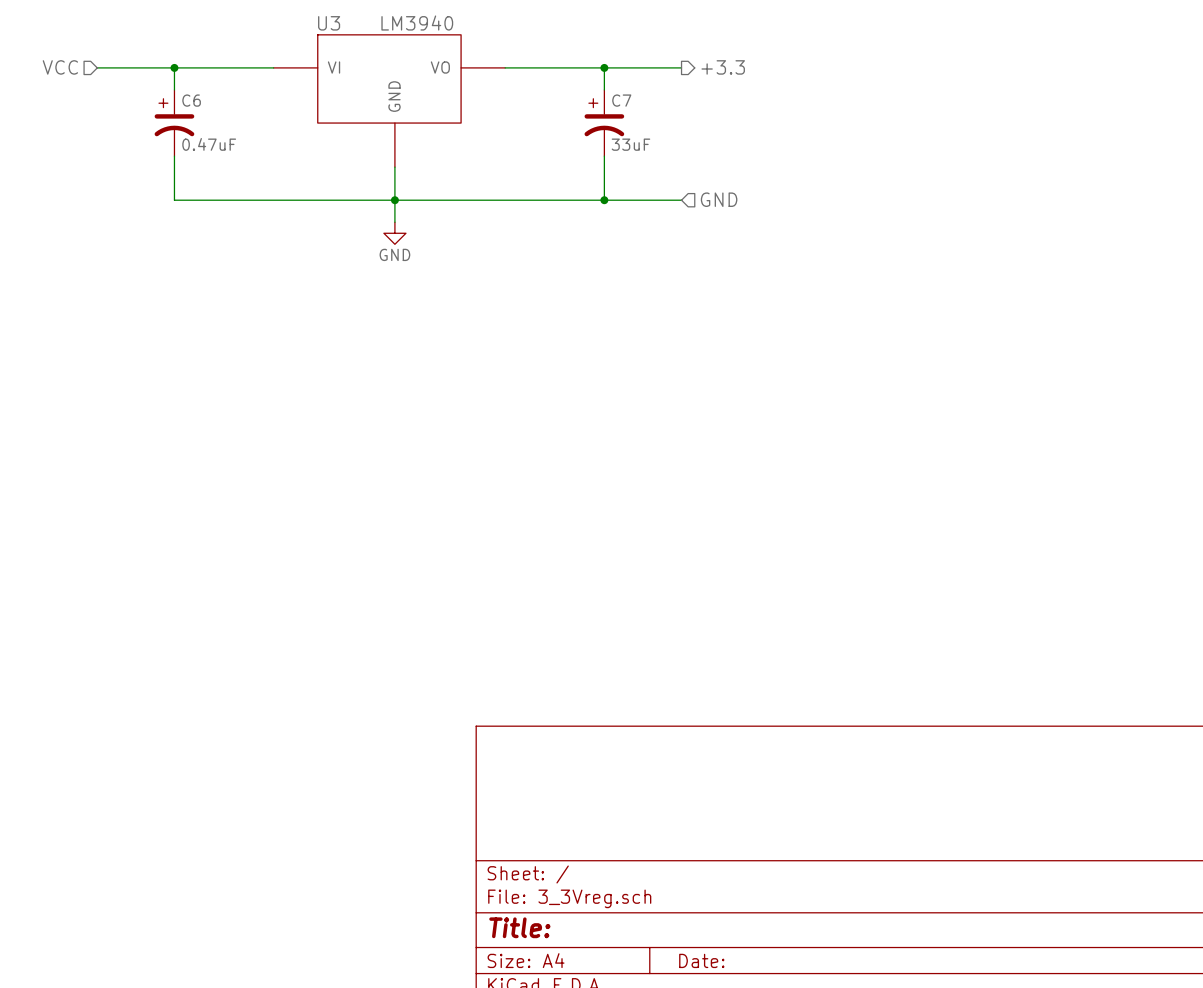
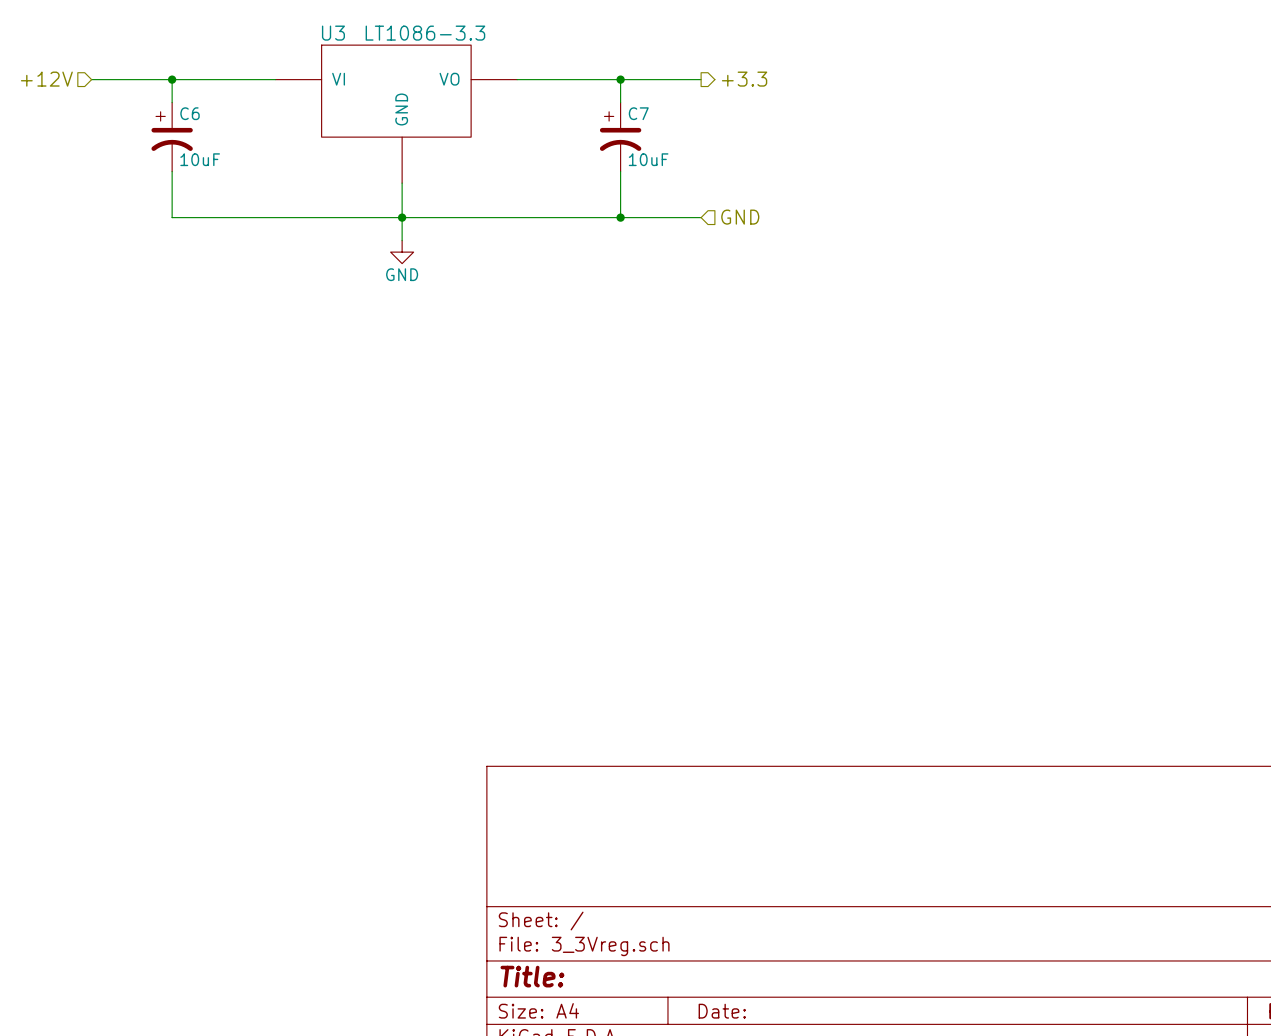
U3 value: LM3940 (417, 23) -> LT1086-3.3 (425, 33)
hierarchical label: VCC (60, 67) -> +12V (46, 79)
C6 value: 0.47uF (209, 144) -> 10uF (200, 159)
C7 value: 33uF (630, 144) -> 10uF (648, 159)

